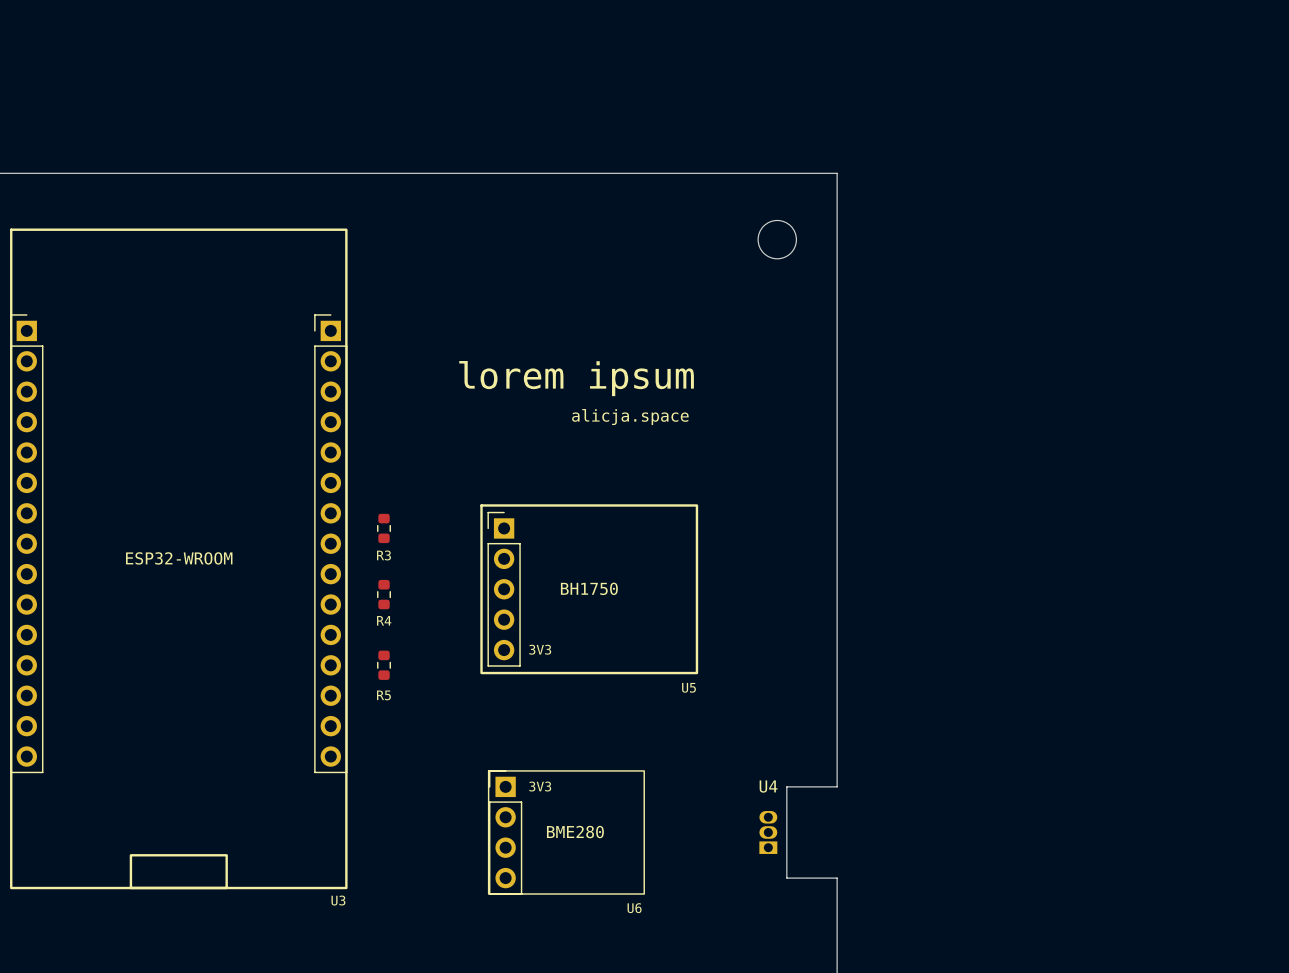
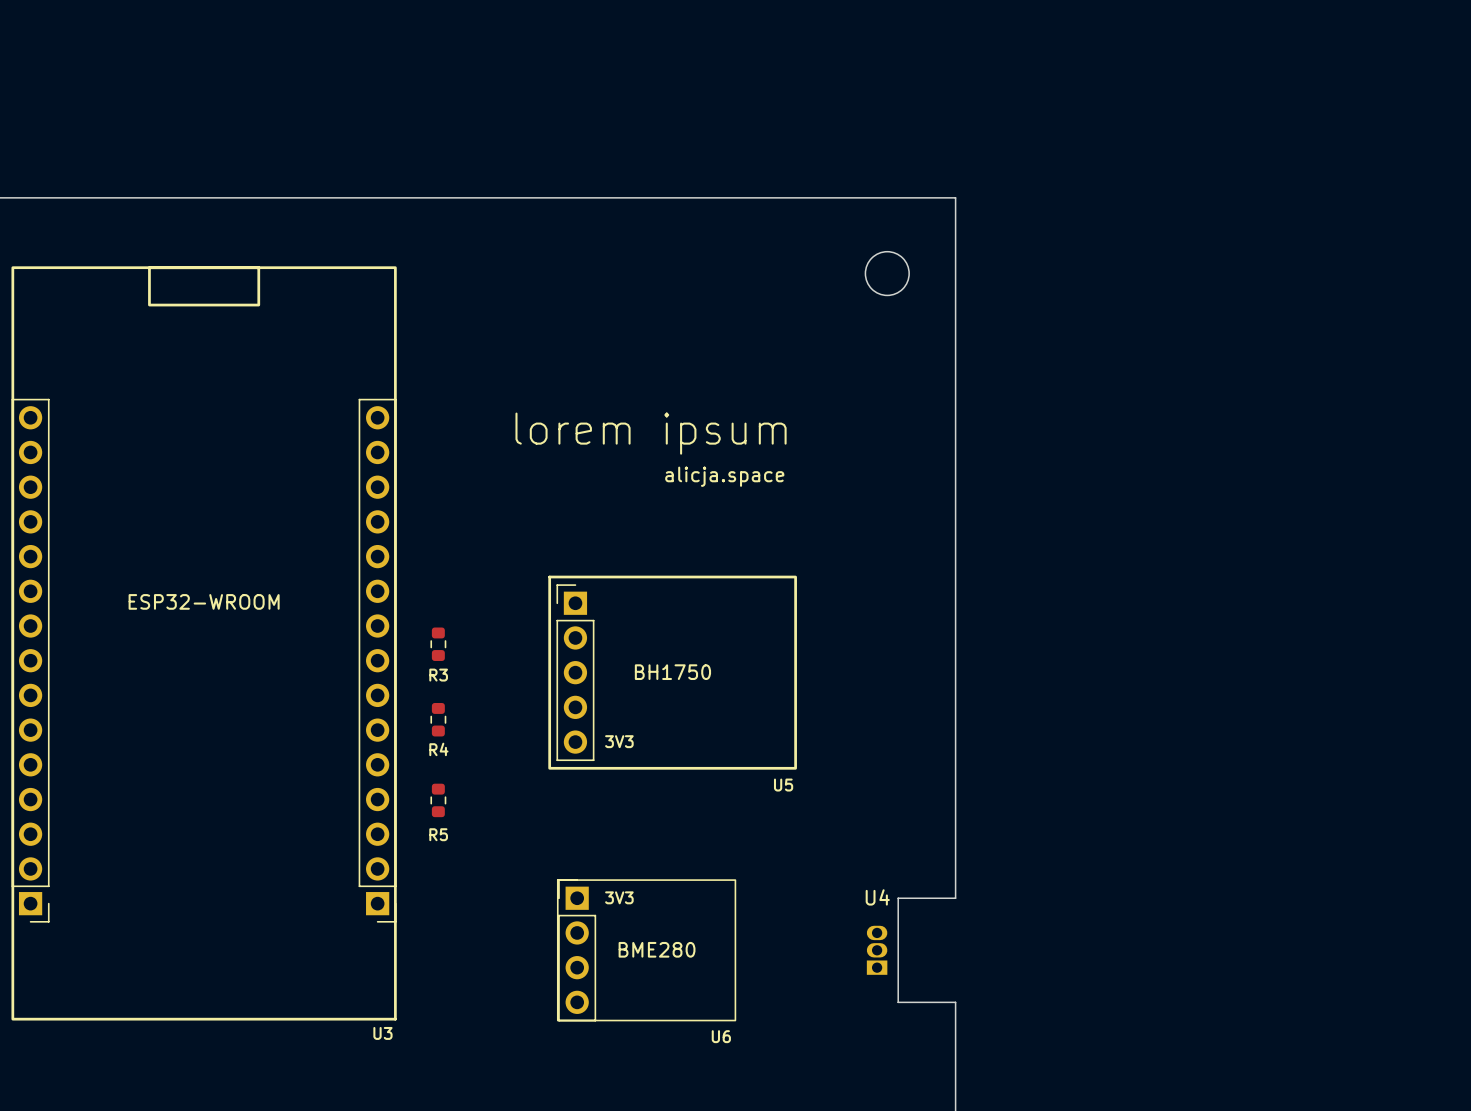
R3 position: (384, 528) -> (438, 644)
U3 rotation: 0° (178, 558) -> 180° (204, 643)
U3 value position: ESP32-WROOM (179, 558) -> ESP32-WROOM (204, 601)
R4 position: (384, 594) -> (438, 719)
R5 position: (384, 665) -> (438, 800)

